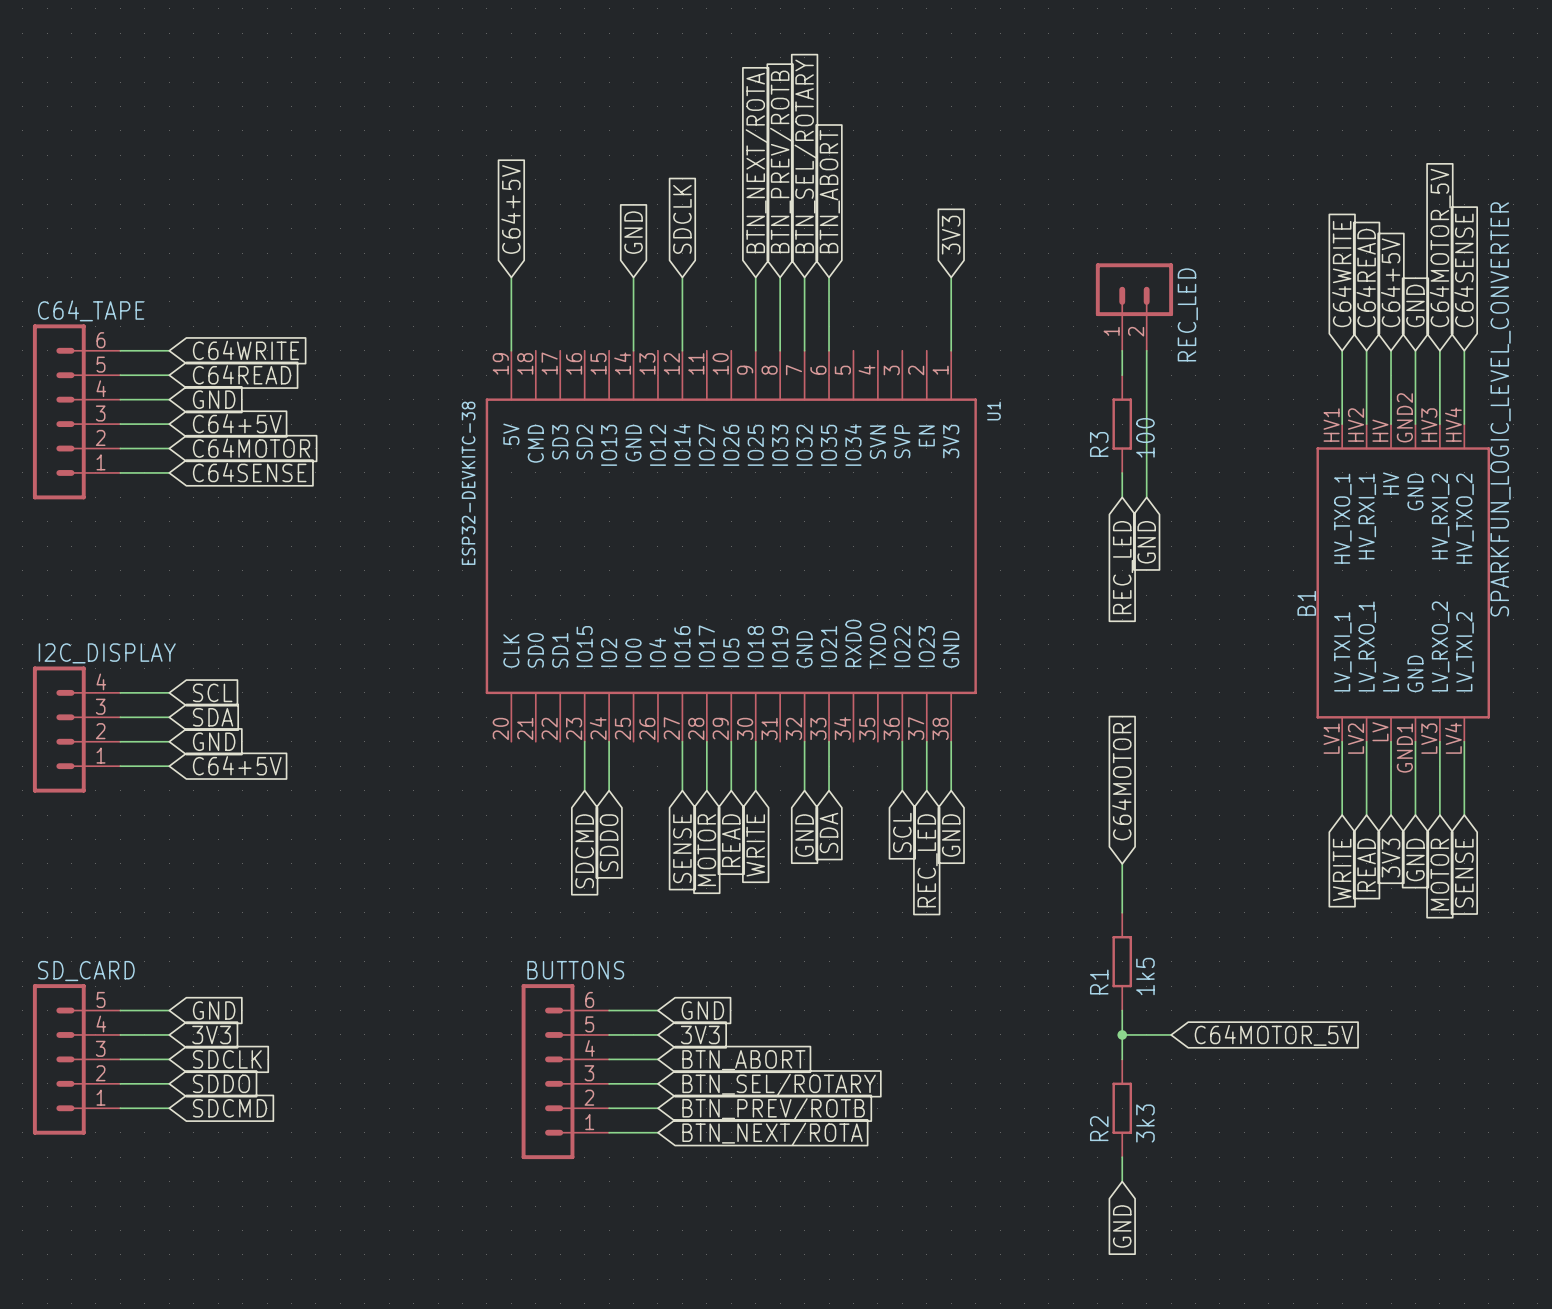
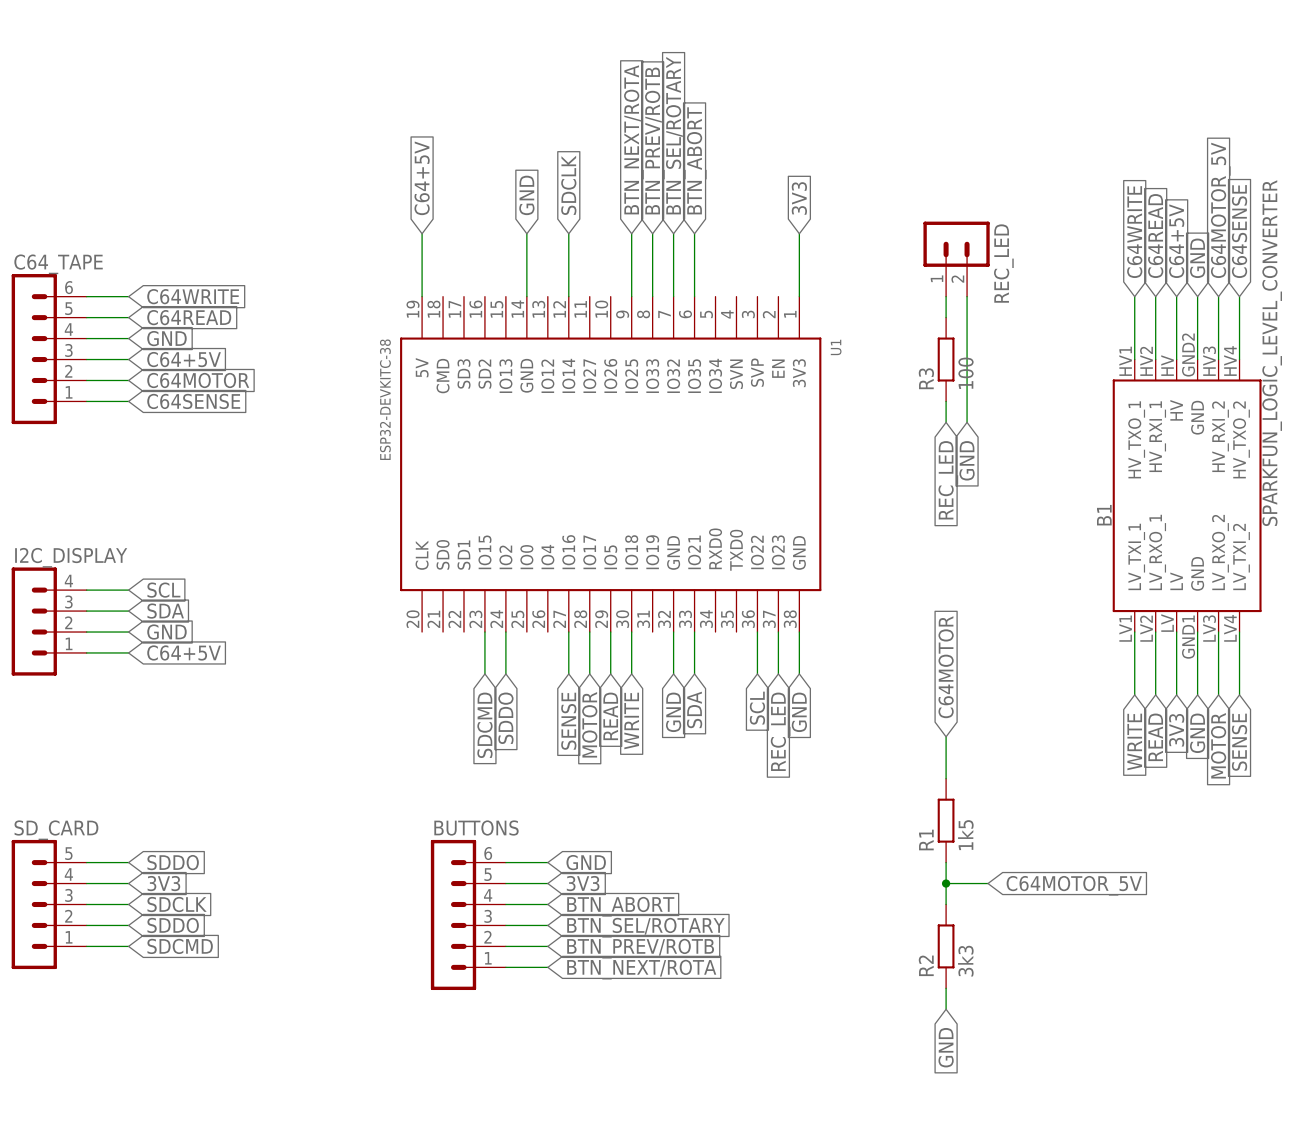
global label: GND (214, 1010) -> SDDO (173, 862)

